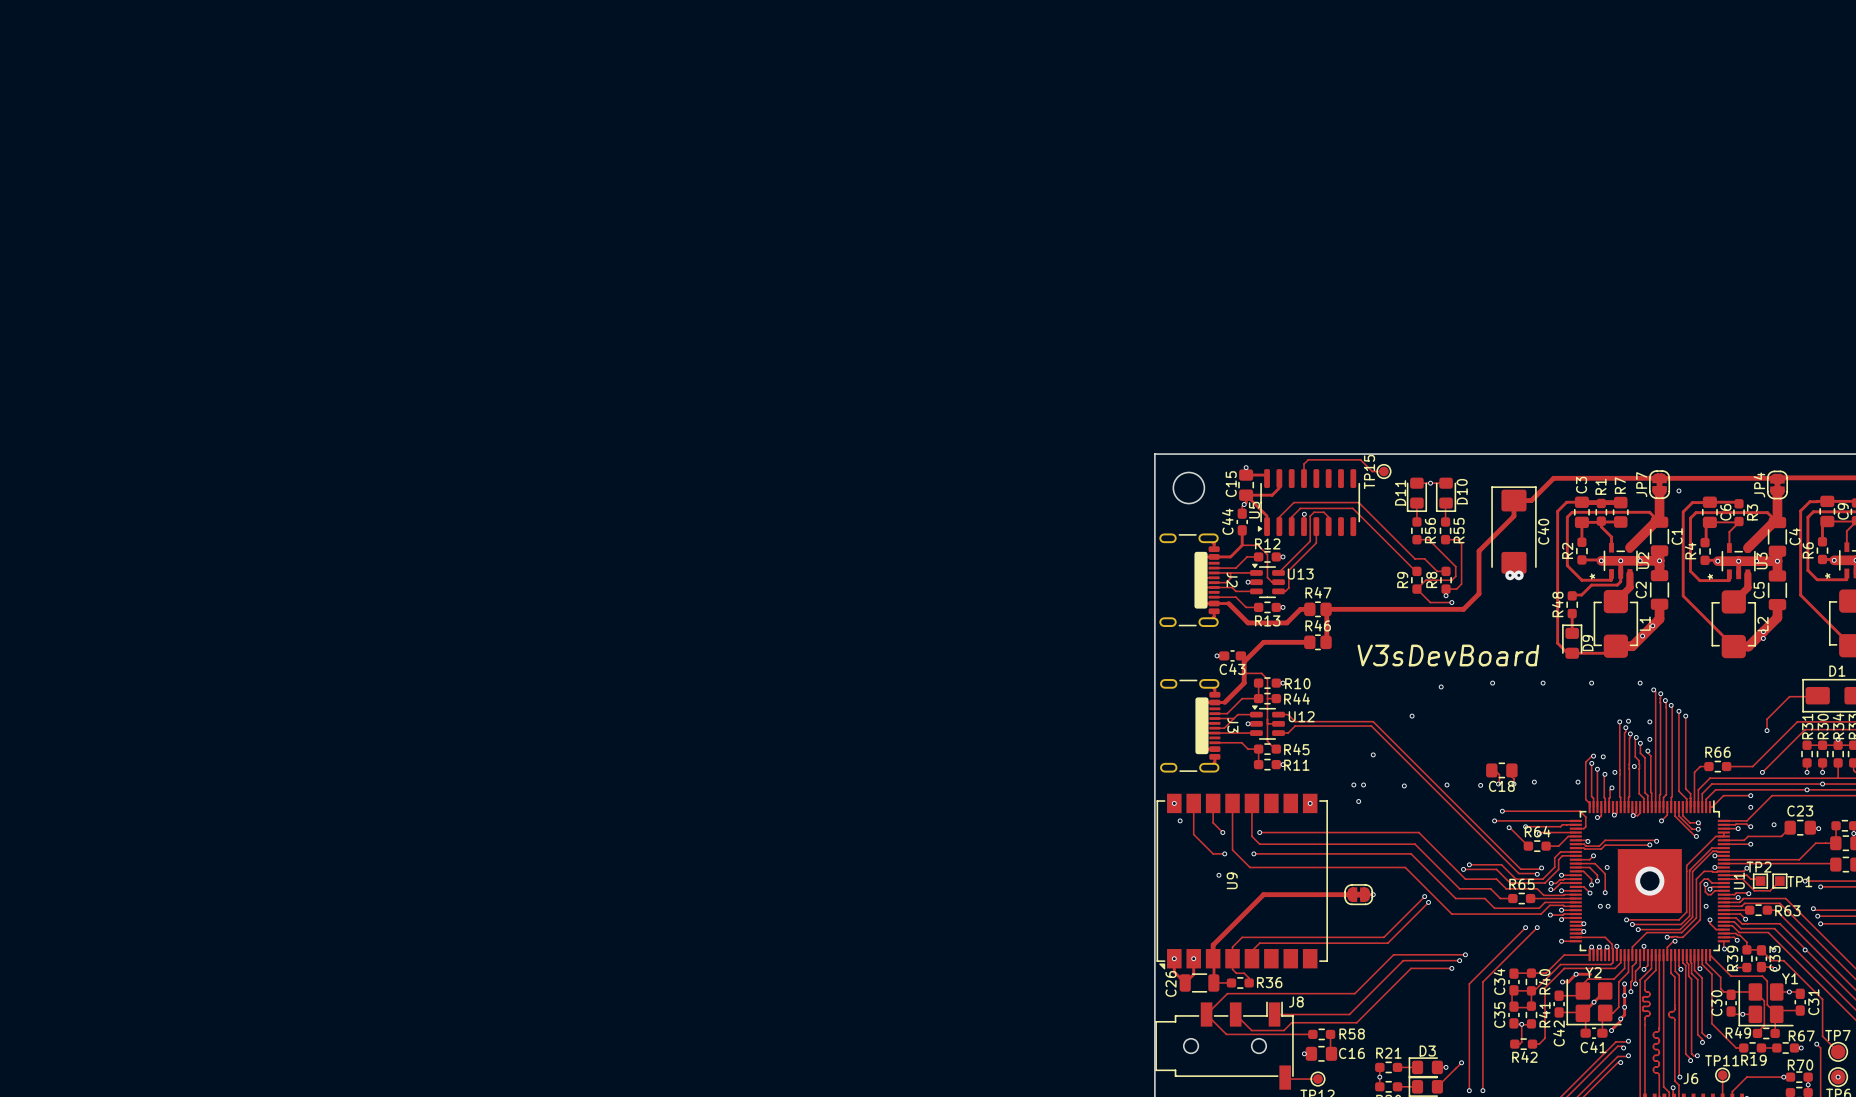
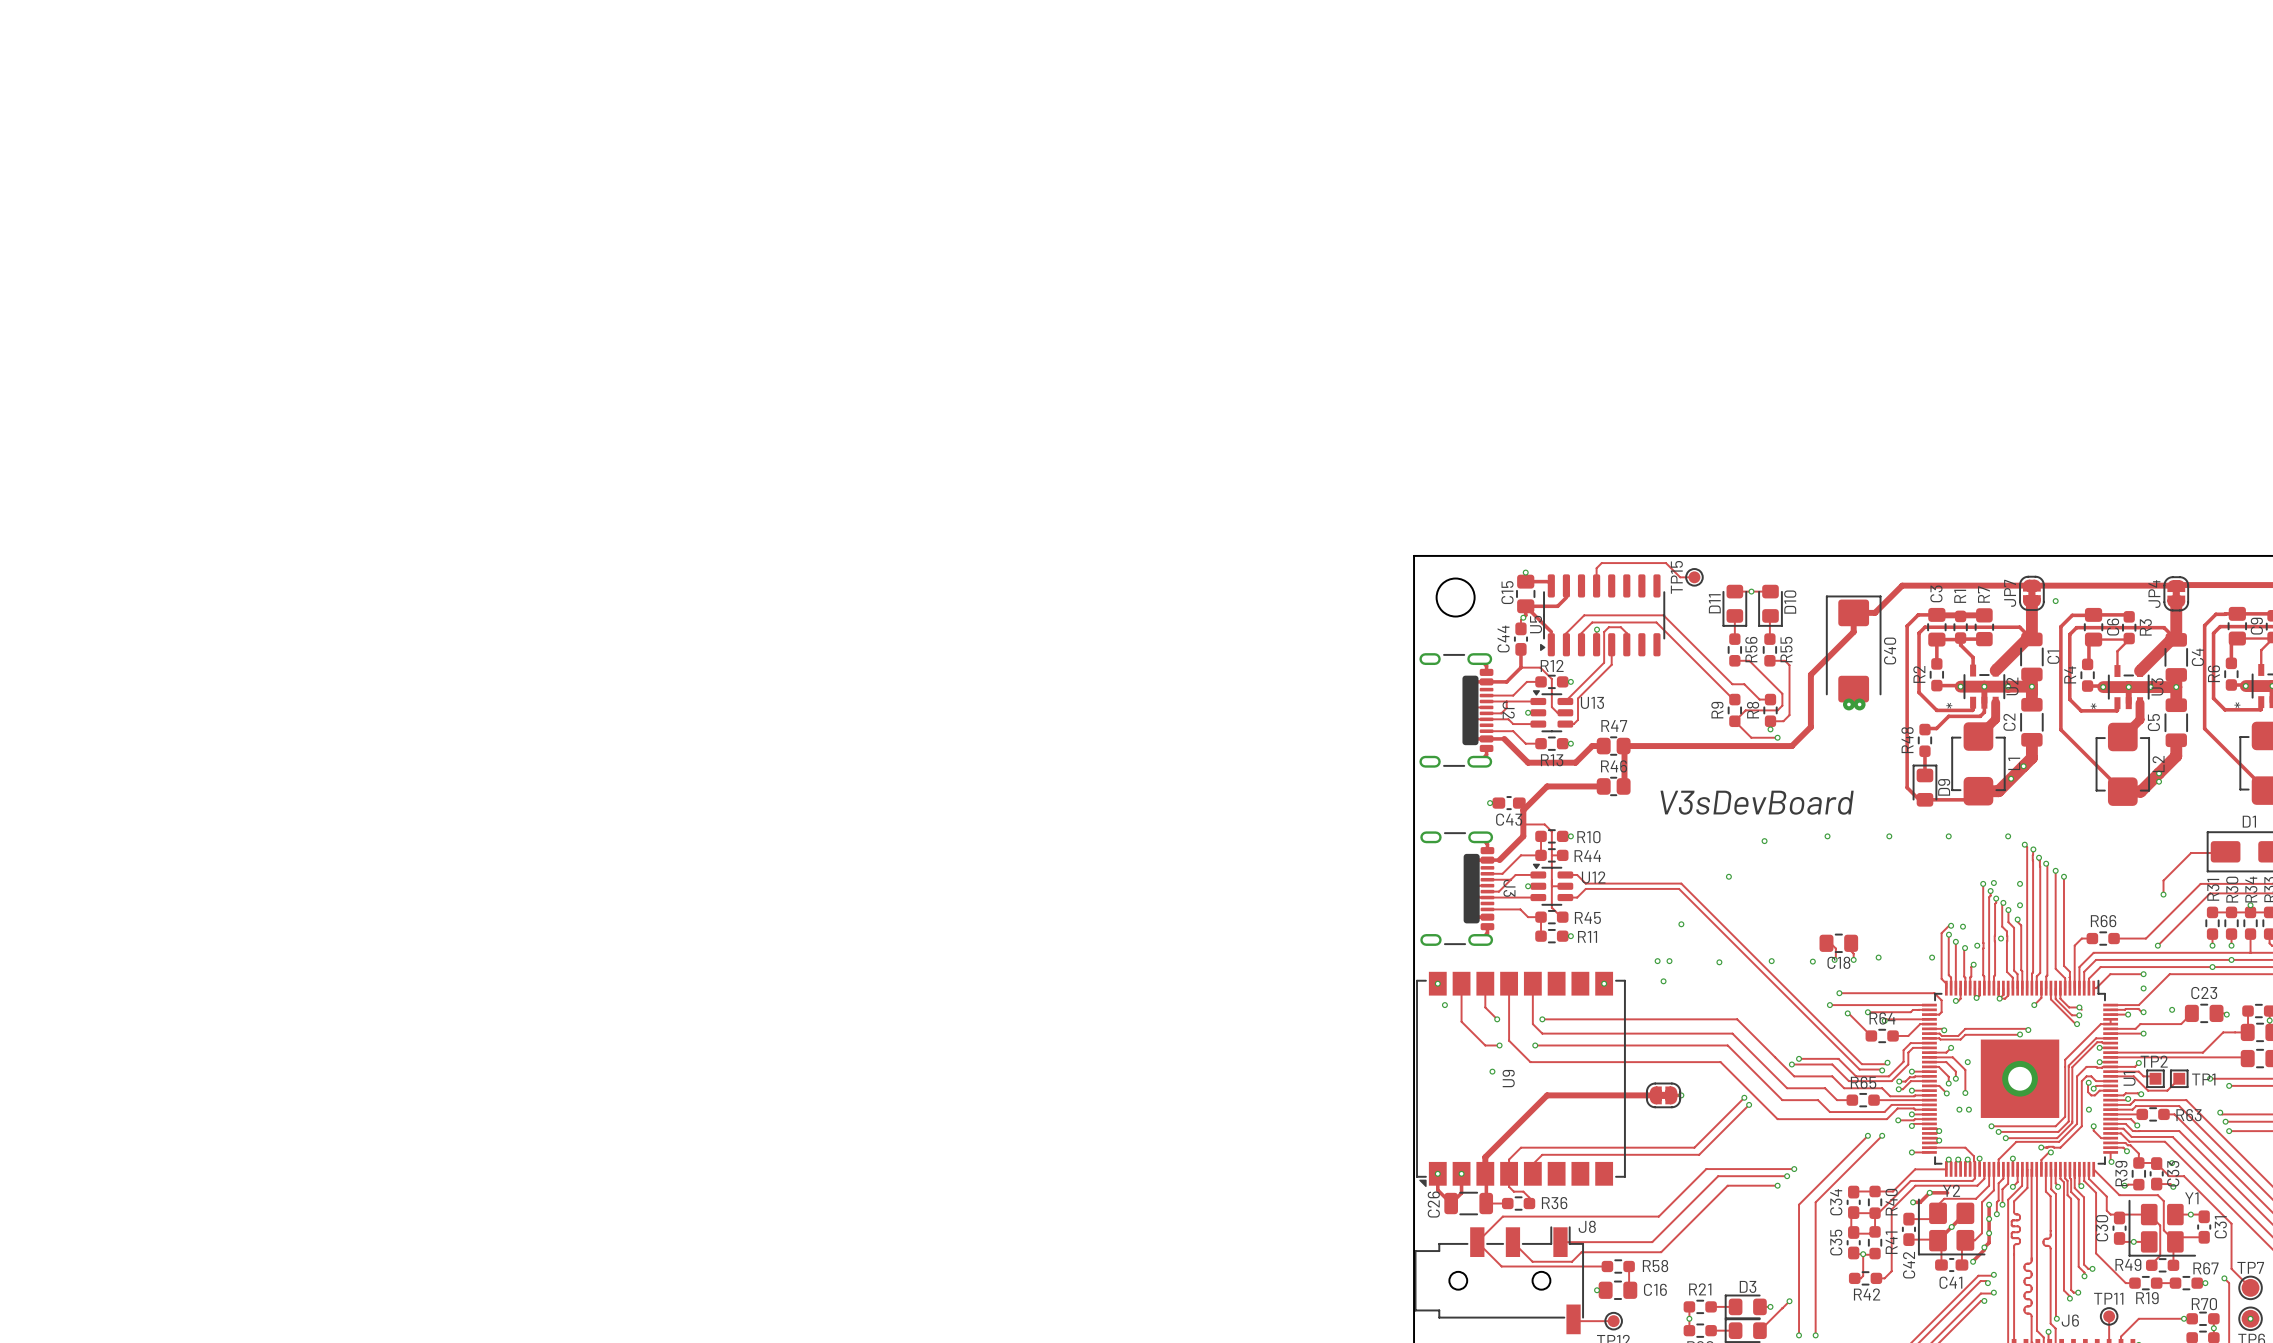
via: (1805, 949) -> none

